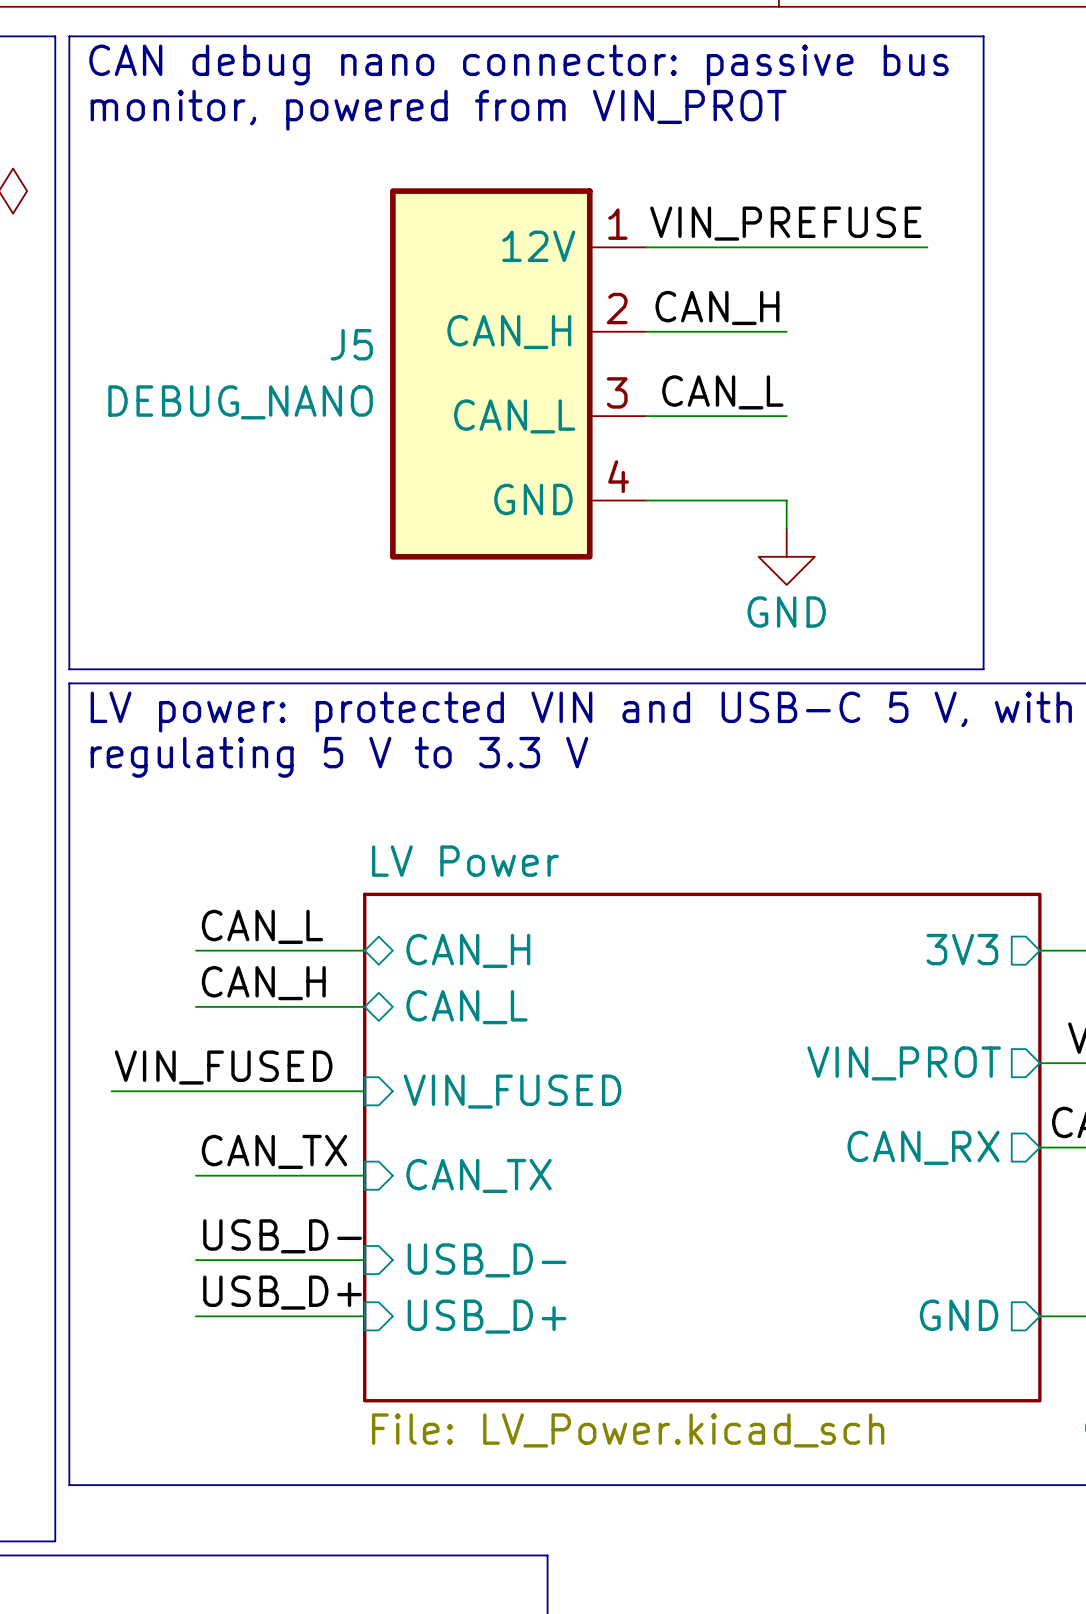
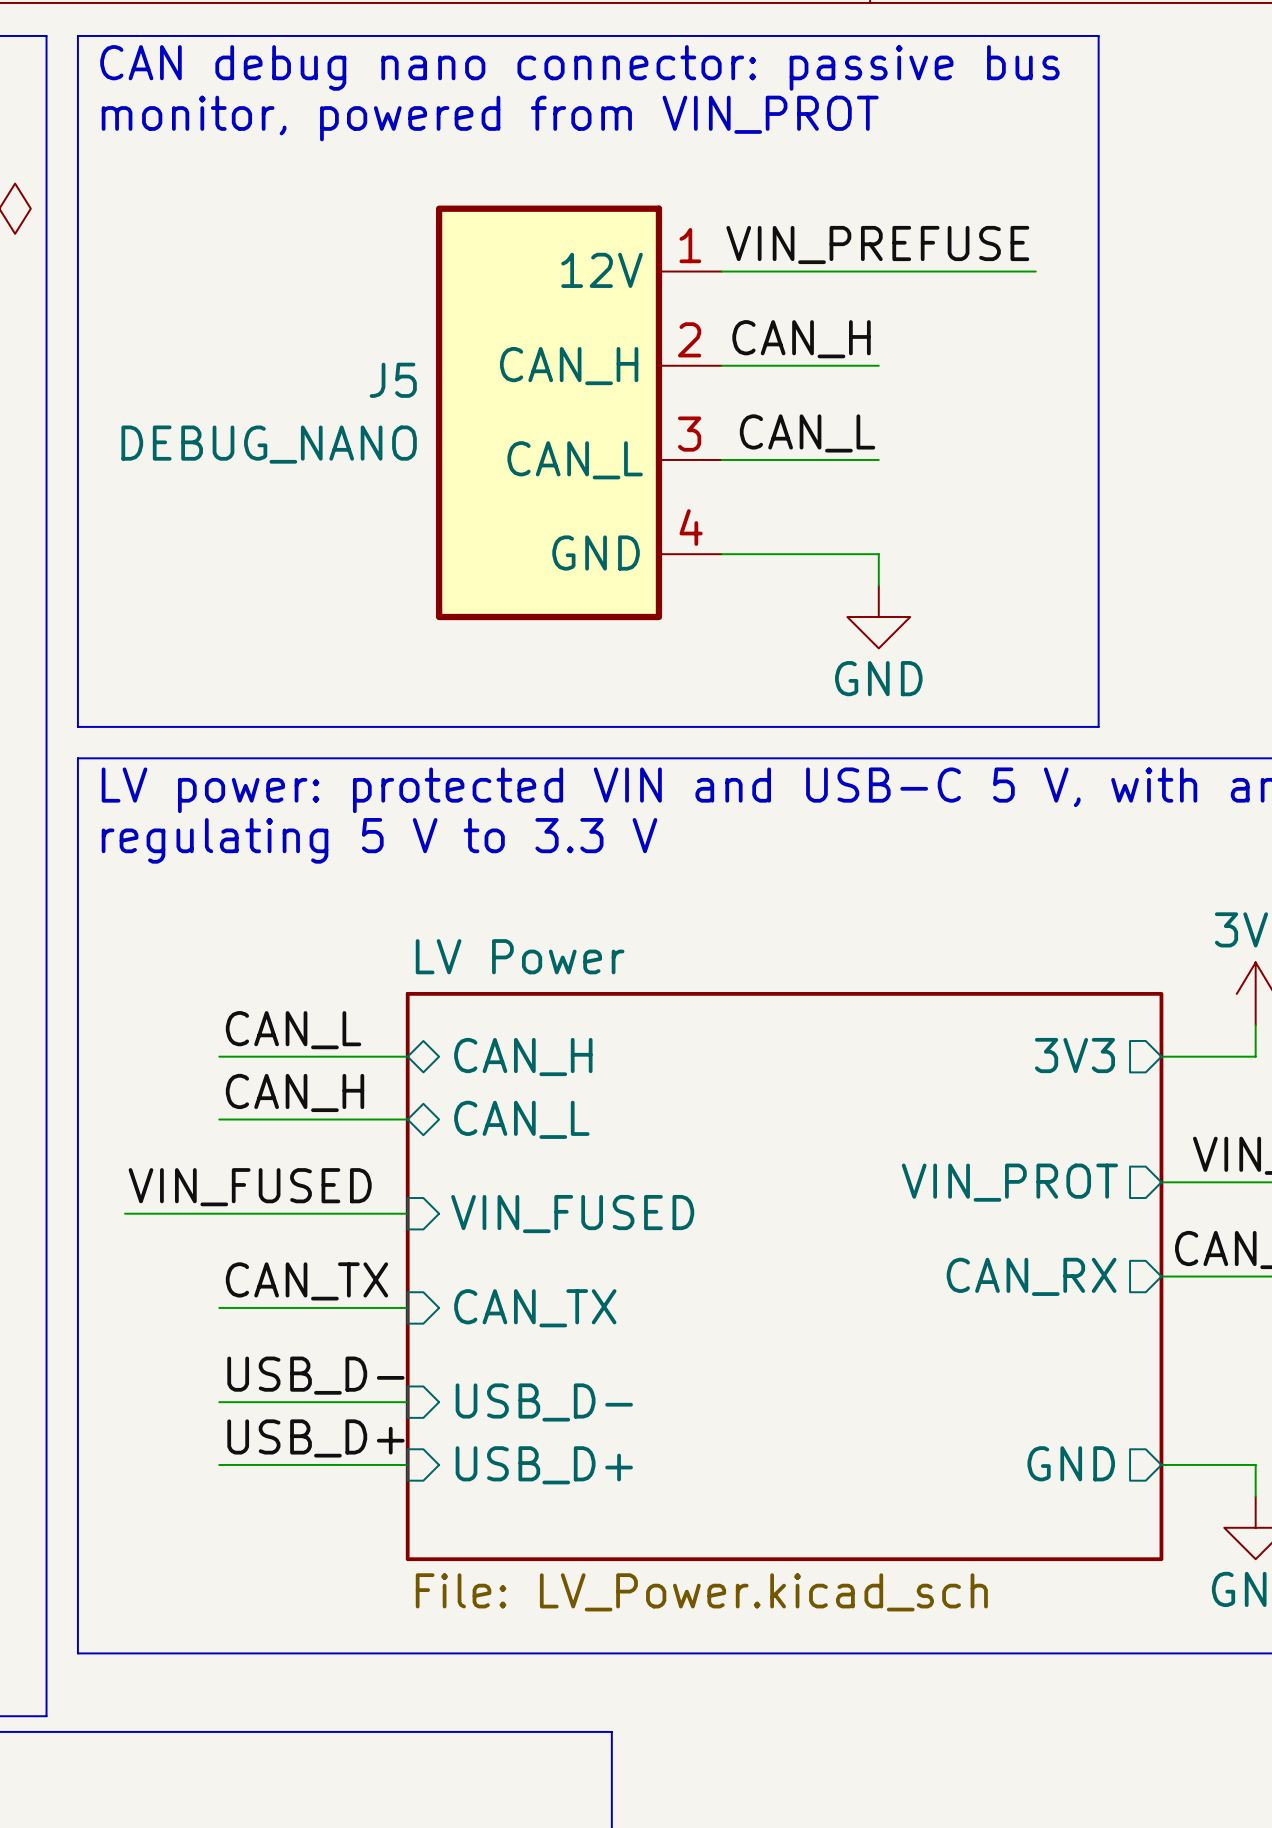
line: (41, 36) (55, 36) (55, 1541) (41, 1541) -> (46, 35) (46, 1716)
line: (69, 655) (69, 669) (983, 669) (983, 655) -> (77, 726) (1098, 726)

